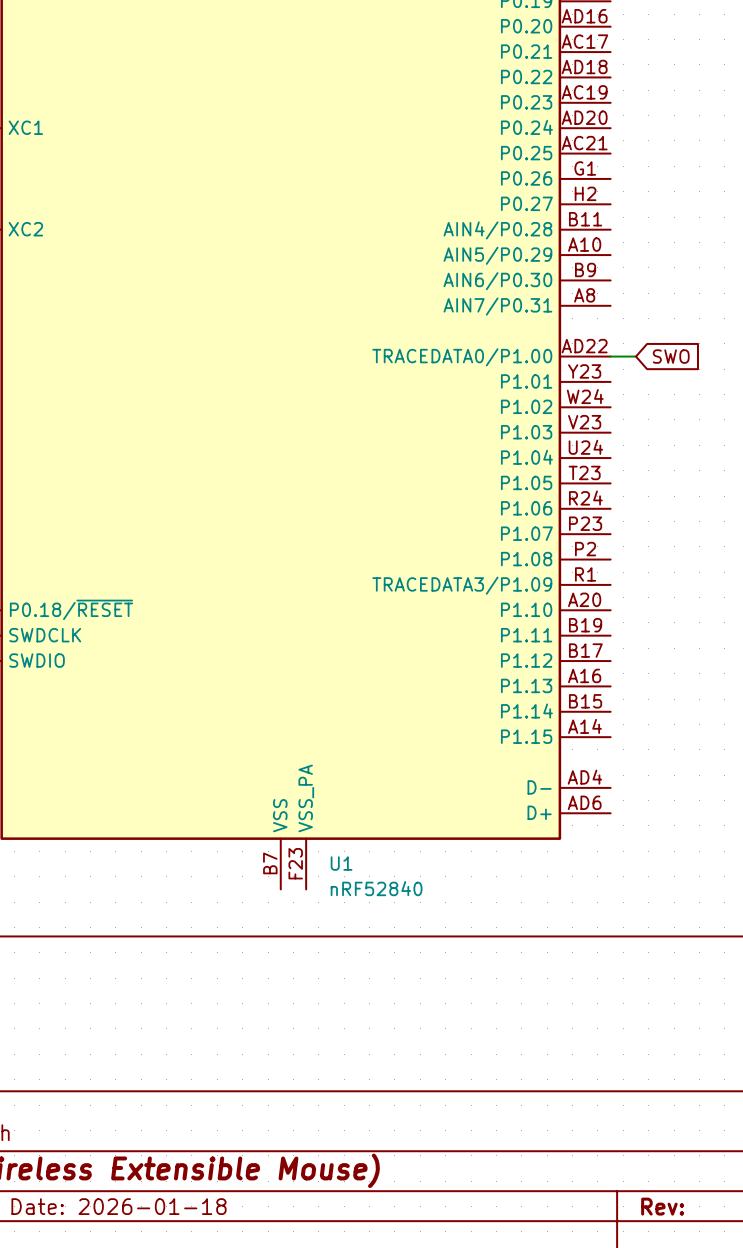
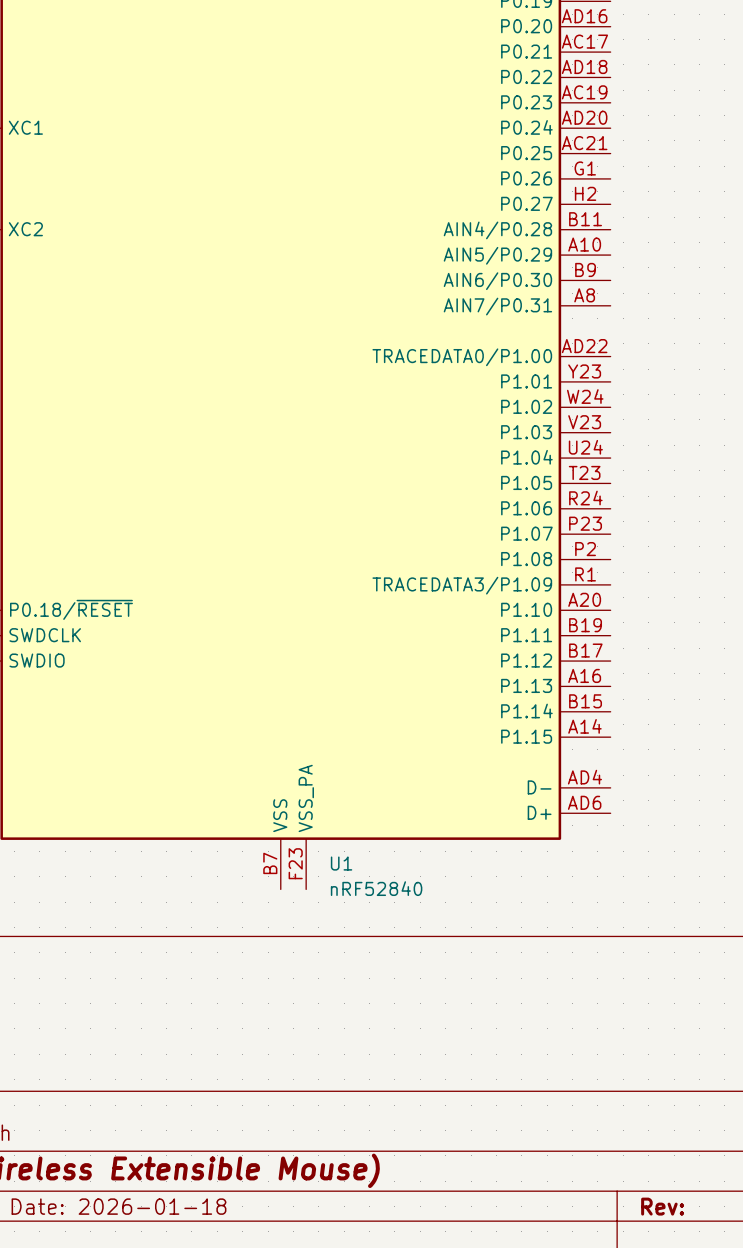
wire: (610, 356) (636, 356) -> none
global label: SWO (671, 356) -> none

